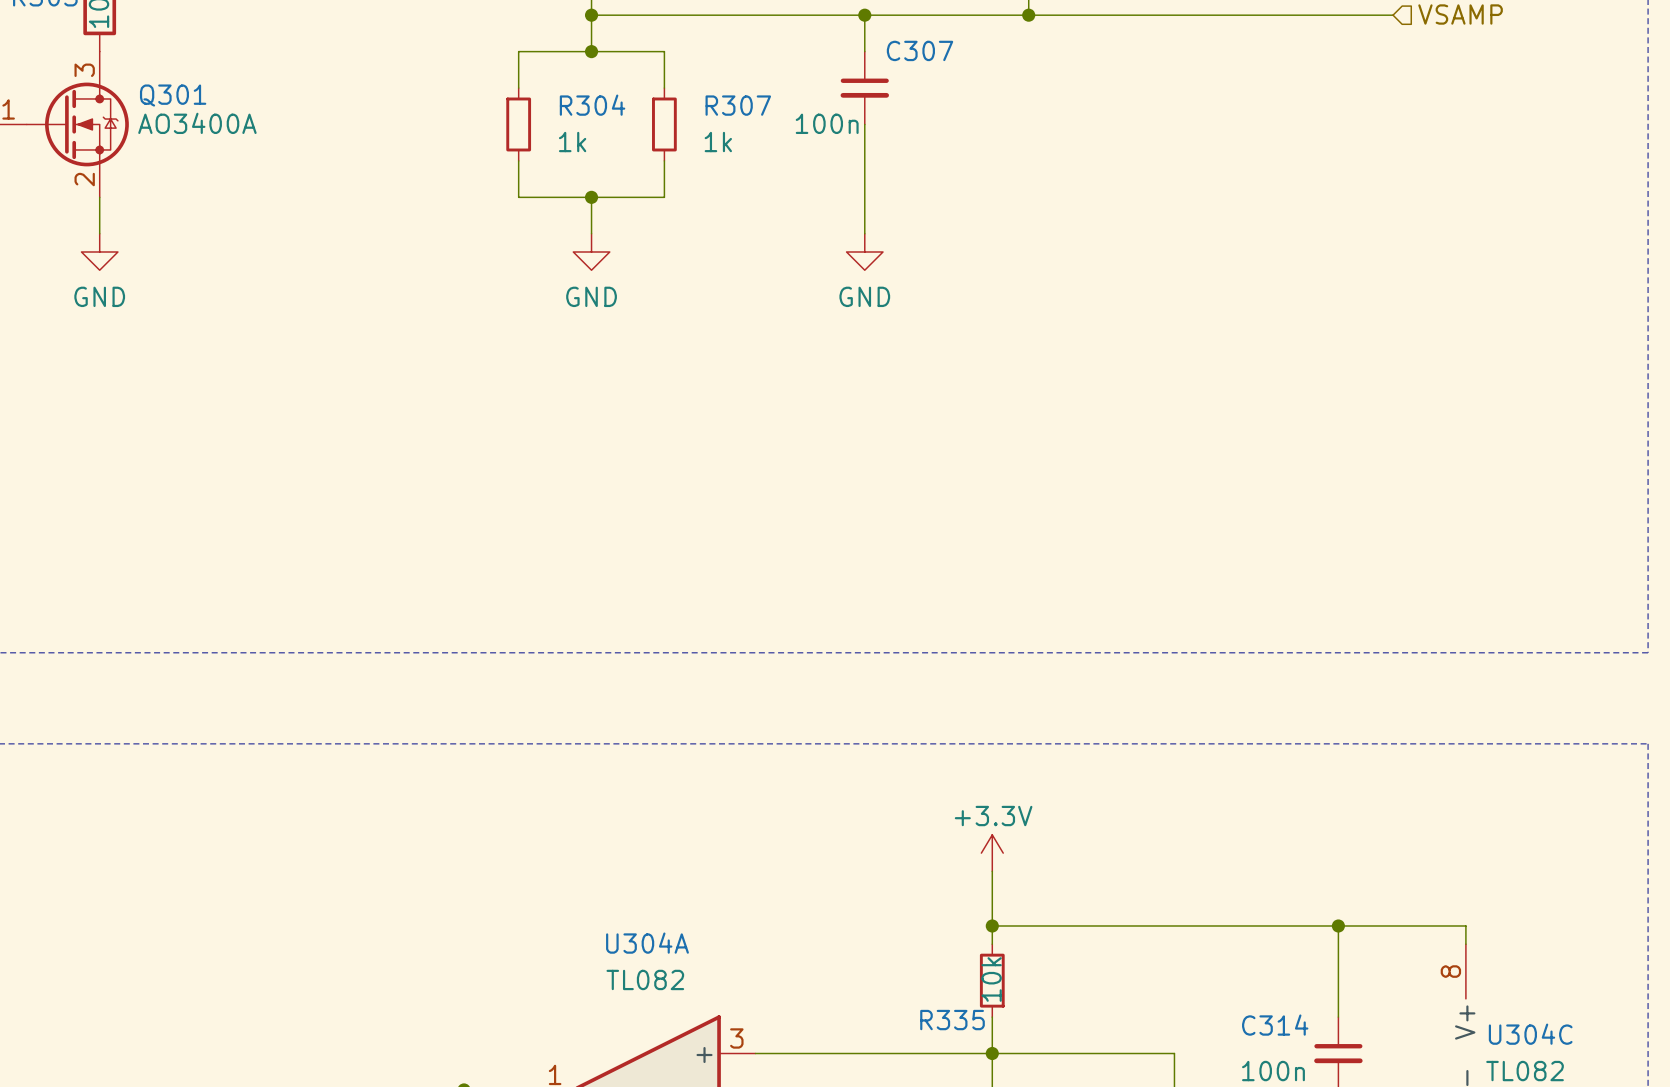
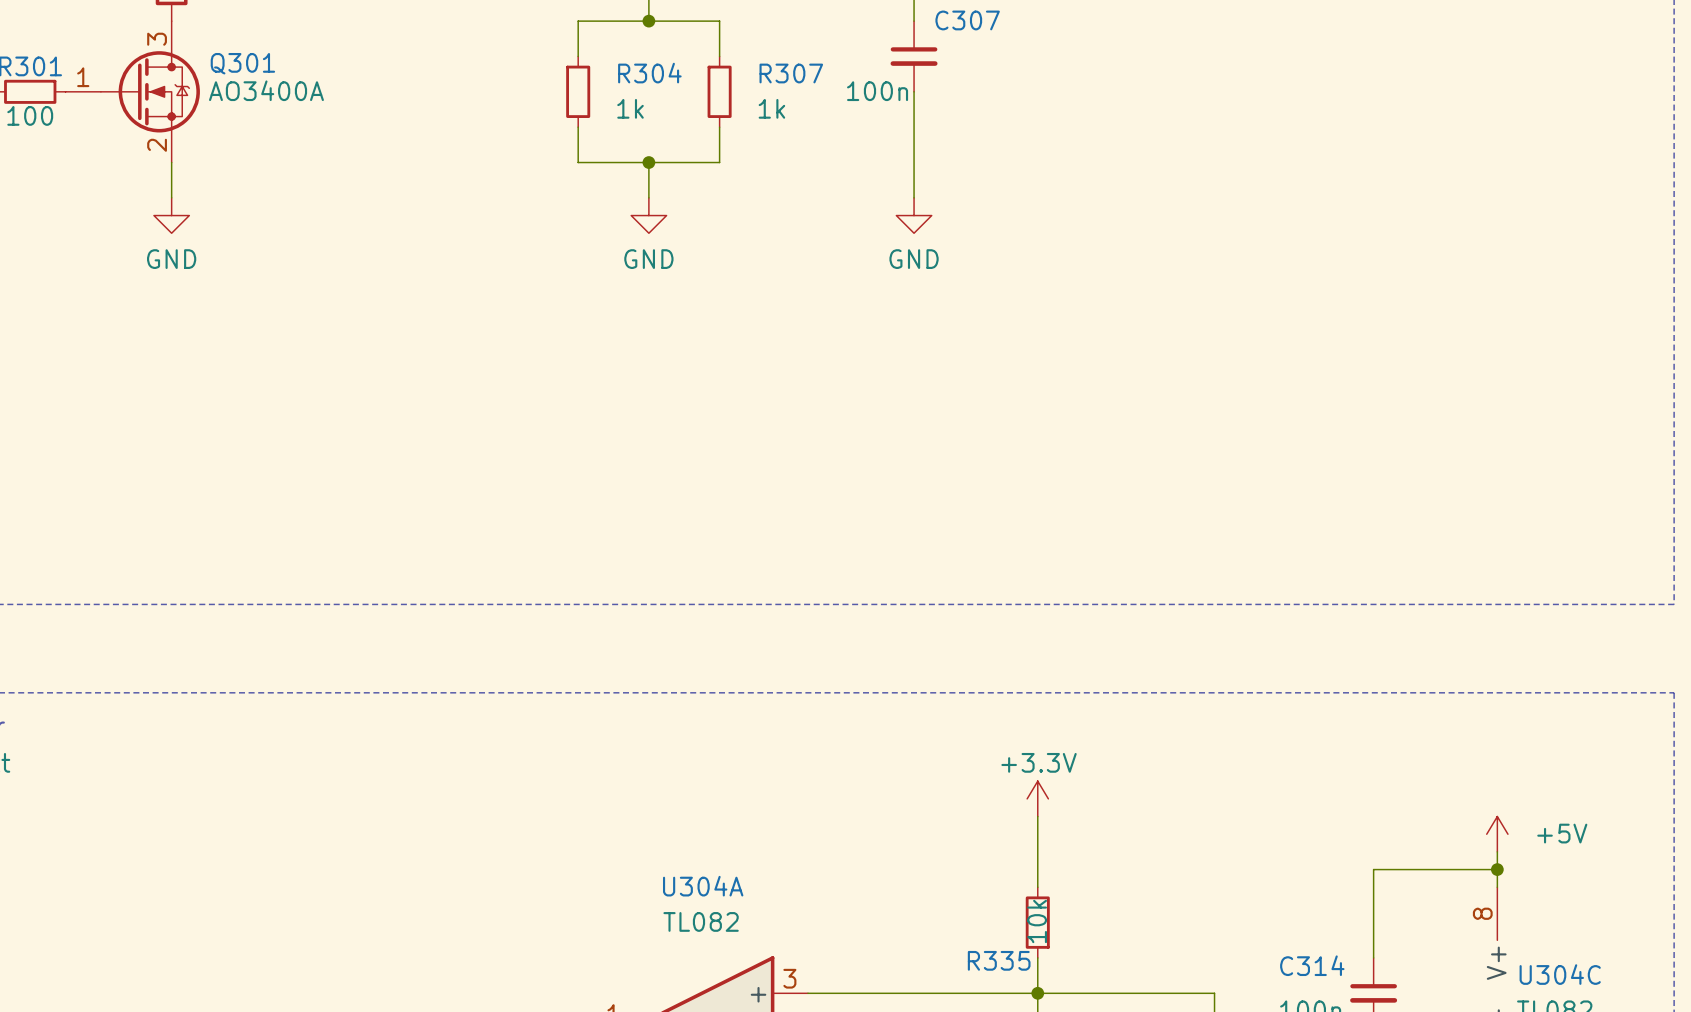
power symbol: none -> +5V (1497, 834)
wire: none -> (1497, 851) (1497, 869)
wire: (992, 926) (1338, 926) -> none
junction: (992, 926) -> none
junction: (1338, 926) -> none
junction: none -> (1497, 869)

